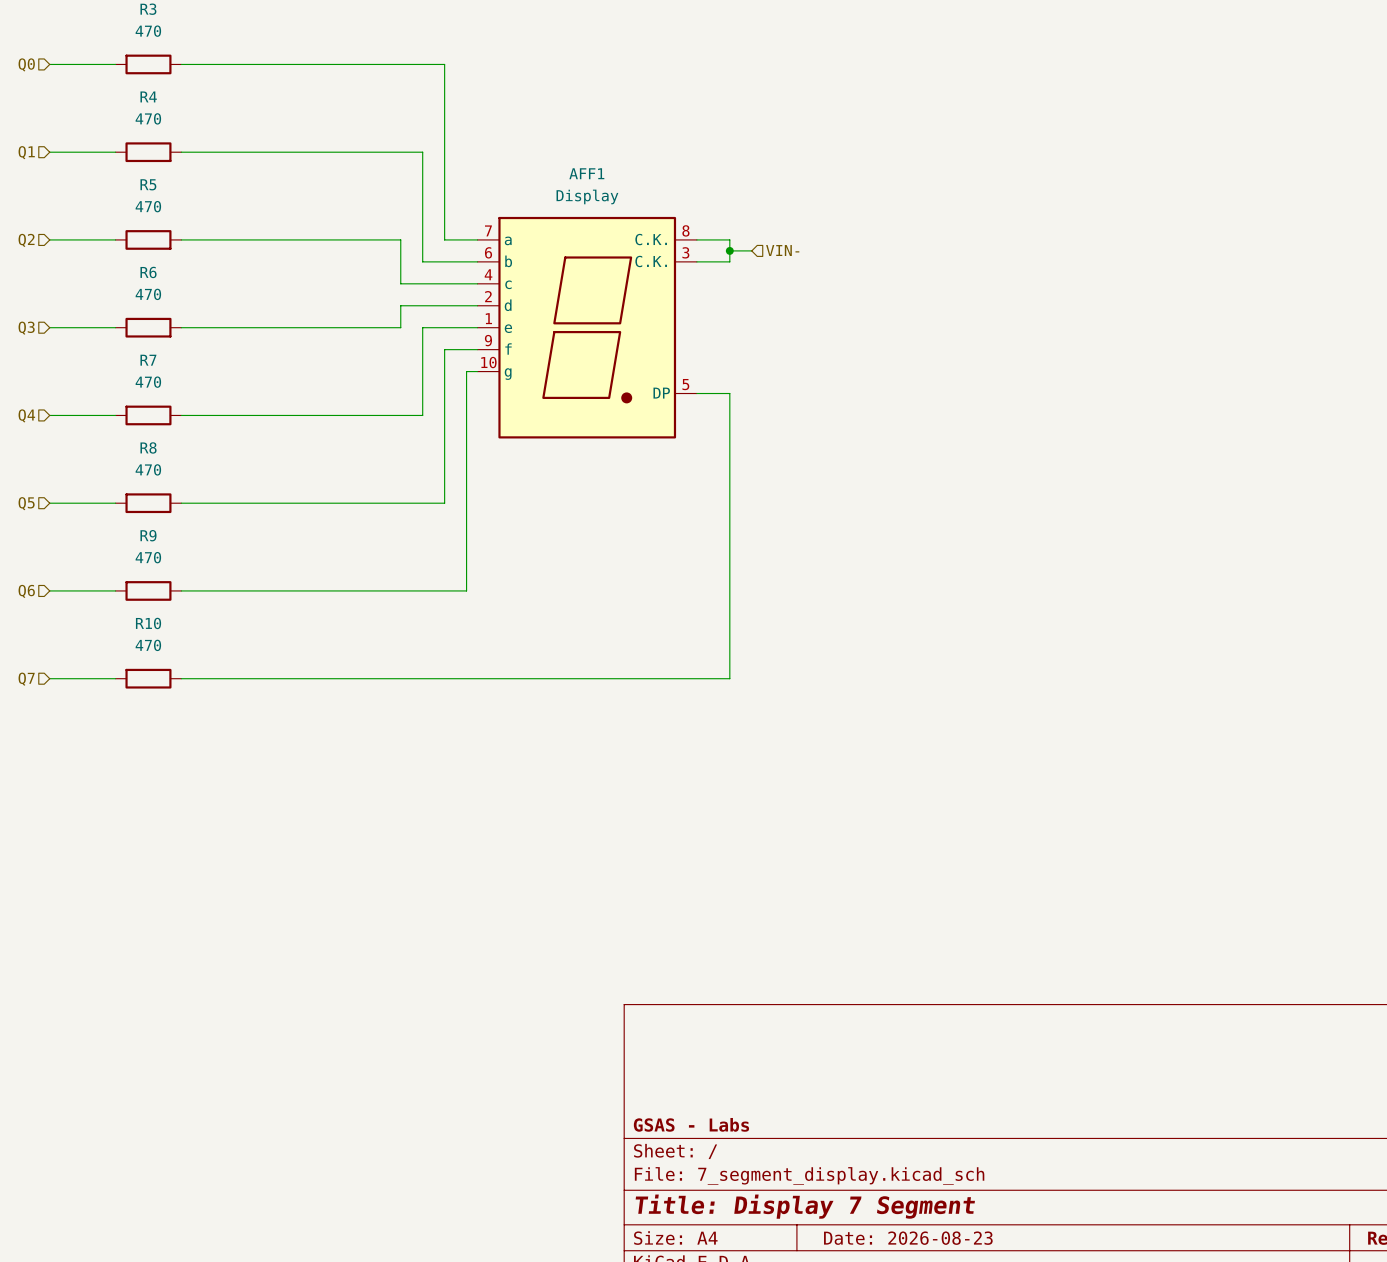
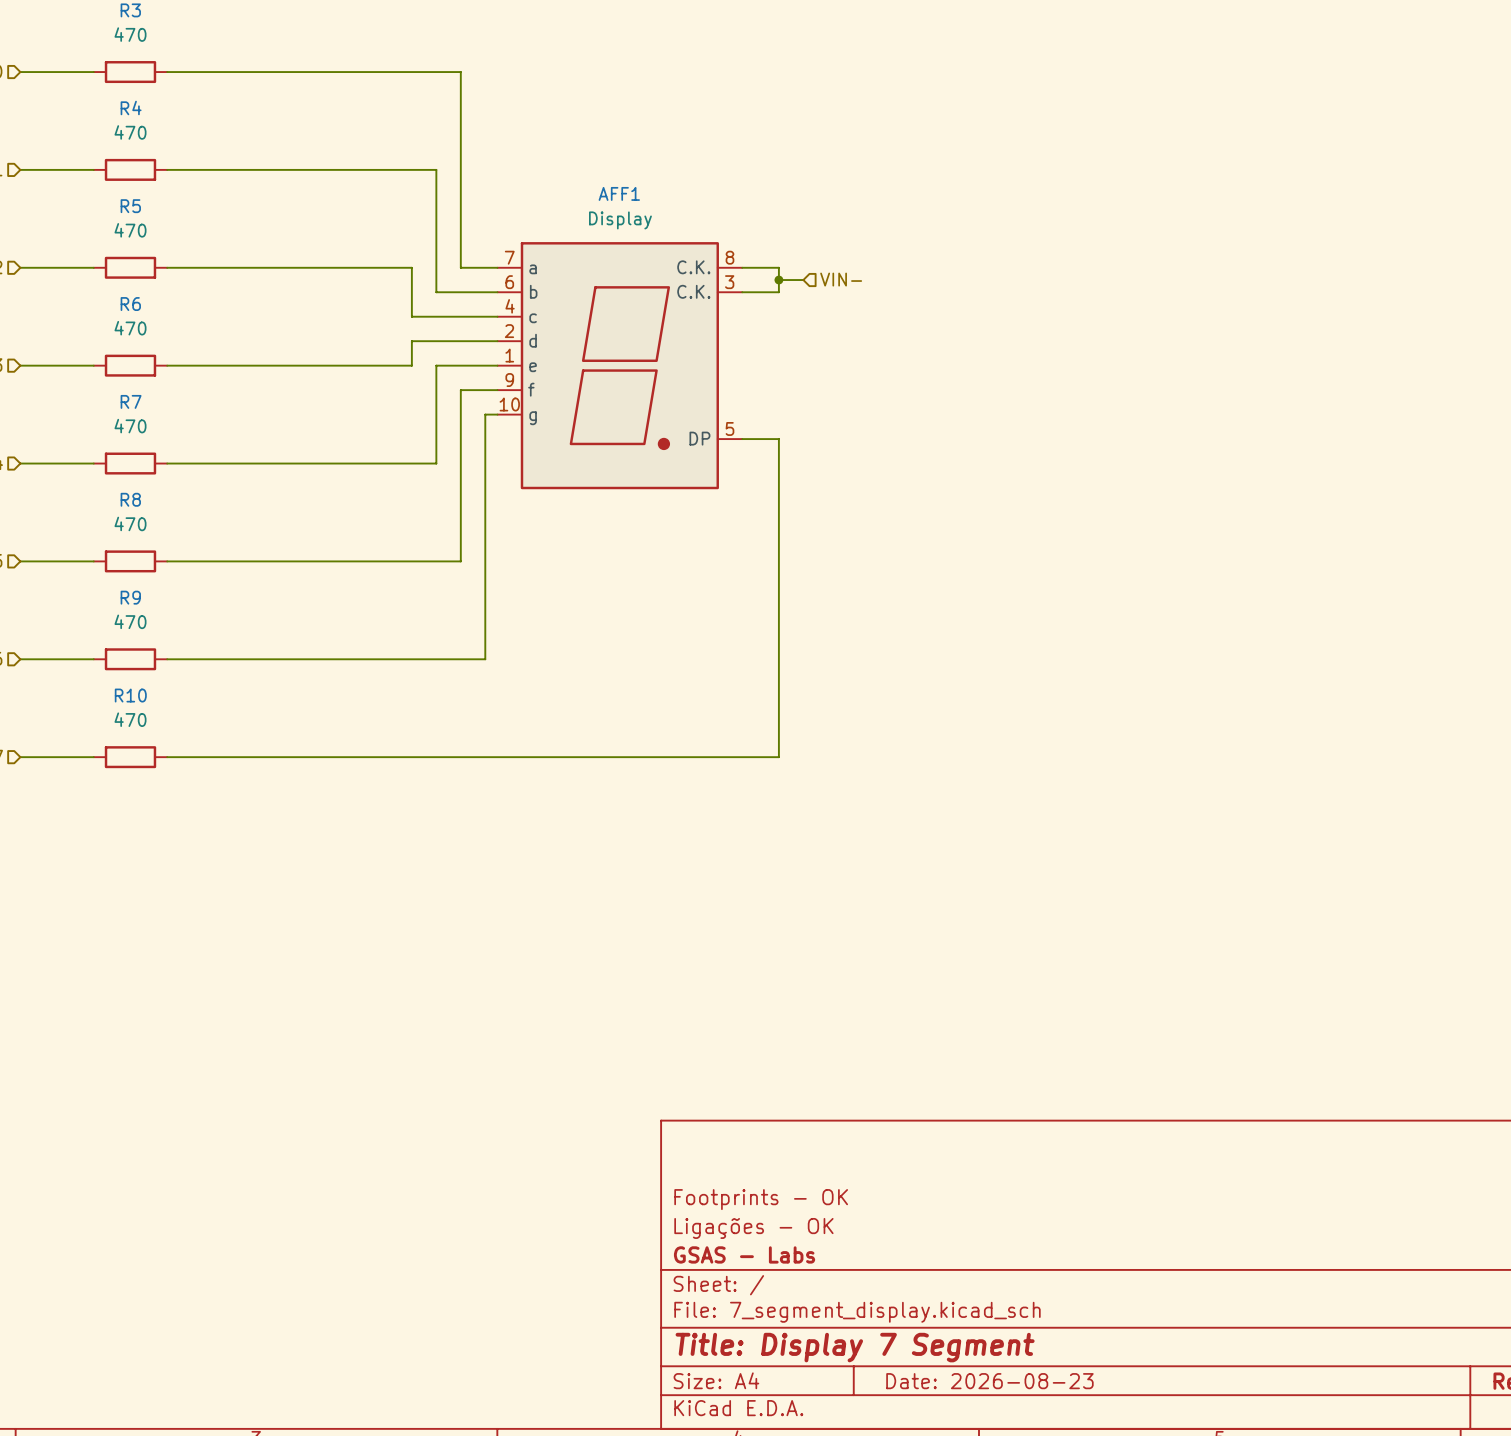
title block: none -> Footprints - OK (761, 1199)
title block: none -> Ligações - OK (753, 1228)

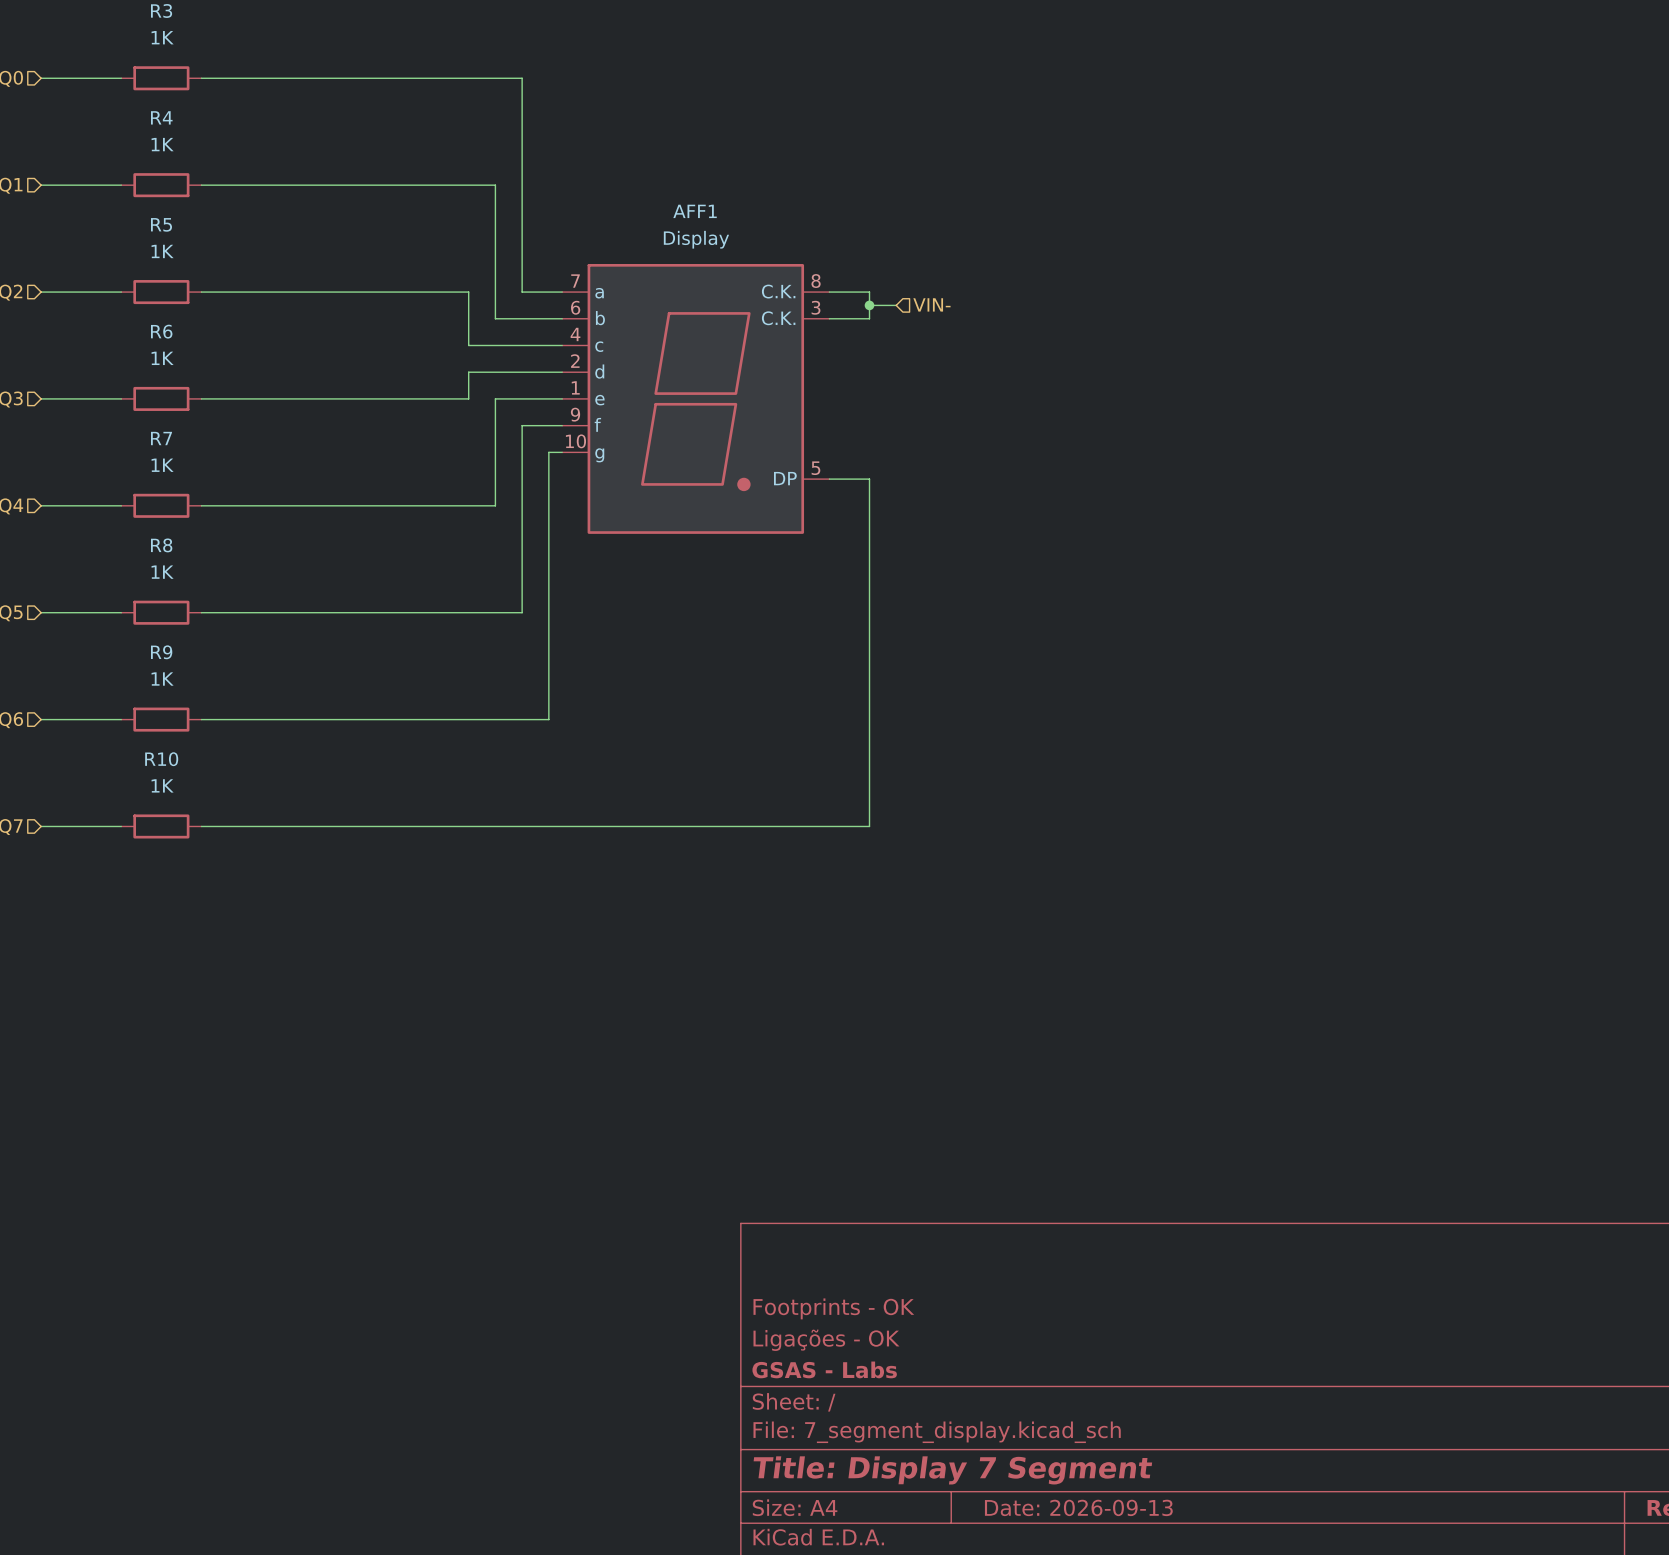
R3 value: 470 (130, 34) -> 1K (162, 37)
R4 value: 470 (130, 132) -> 1K (162, 144)
R5 value: 470 (130, 230) -> 1K (162, 251)
R6 value: 470 (130, 328) -> 1K (162, 358)
R7 value: 470 (130, 426) -> 1K (162, 465)
R8 value: 470 (130, 523) -> 1K (162, 572)
R9 value: 470 (130, 621) -> 1K (162, 679)
R10 value: 470 (130, 719) -> 1K (162, 785)
title block: Date: 2026-08-23 (989, 1381) -> Date: 2026-09-13 (1078, 1507)

